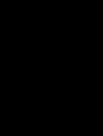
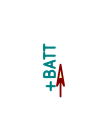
power symbol: none -> +BATT (60, 80)

